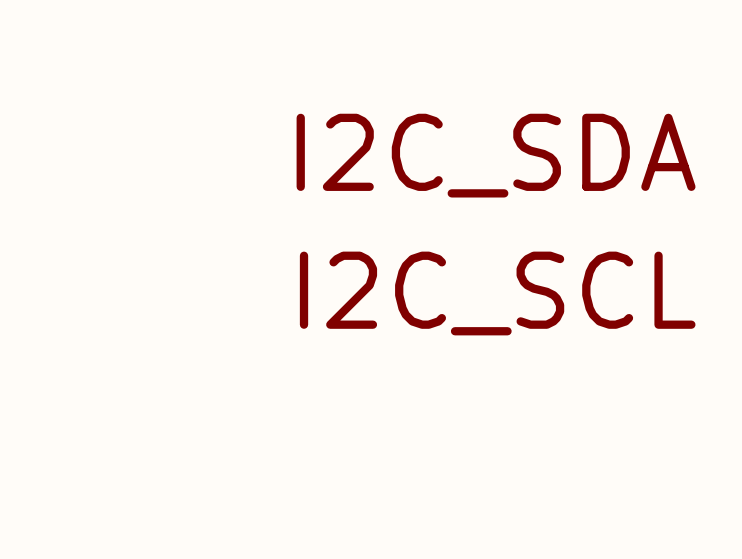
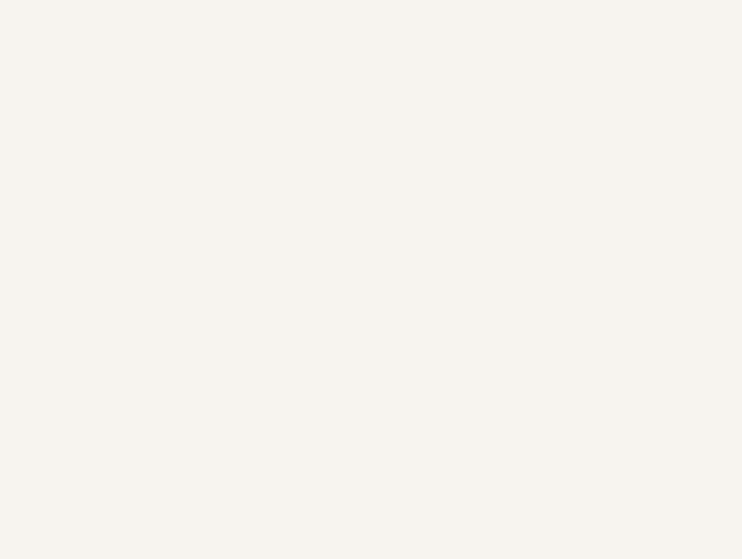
label: I2C_SDA (496, 155) -> none
label: I2C_SCL (497, 293) -> none

